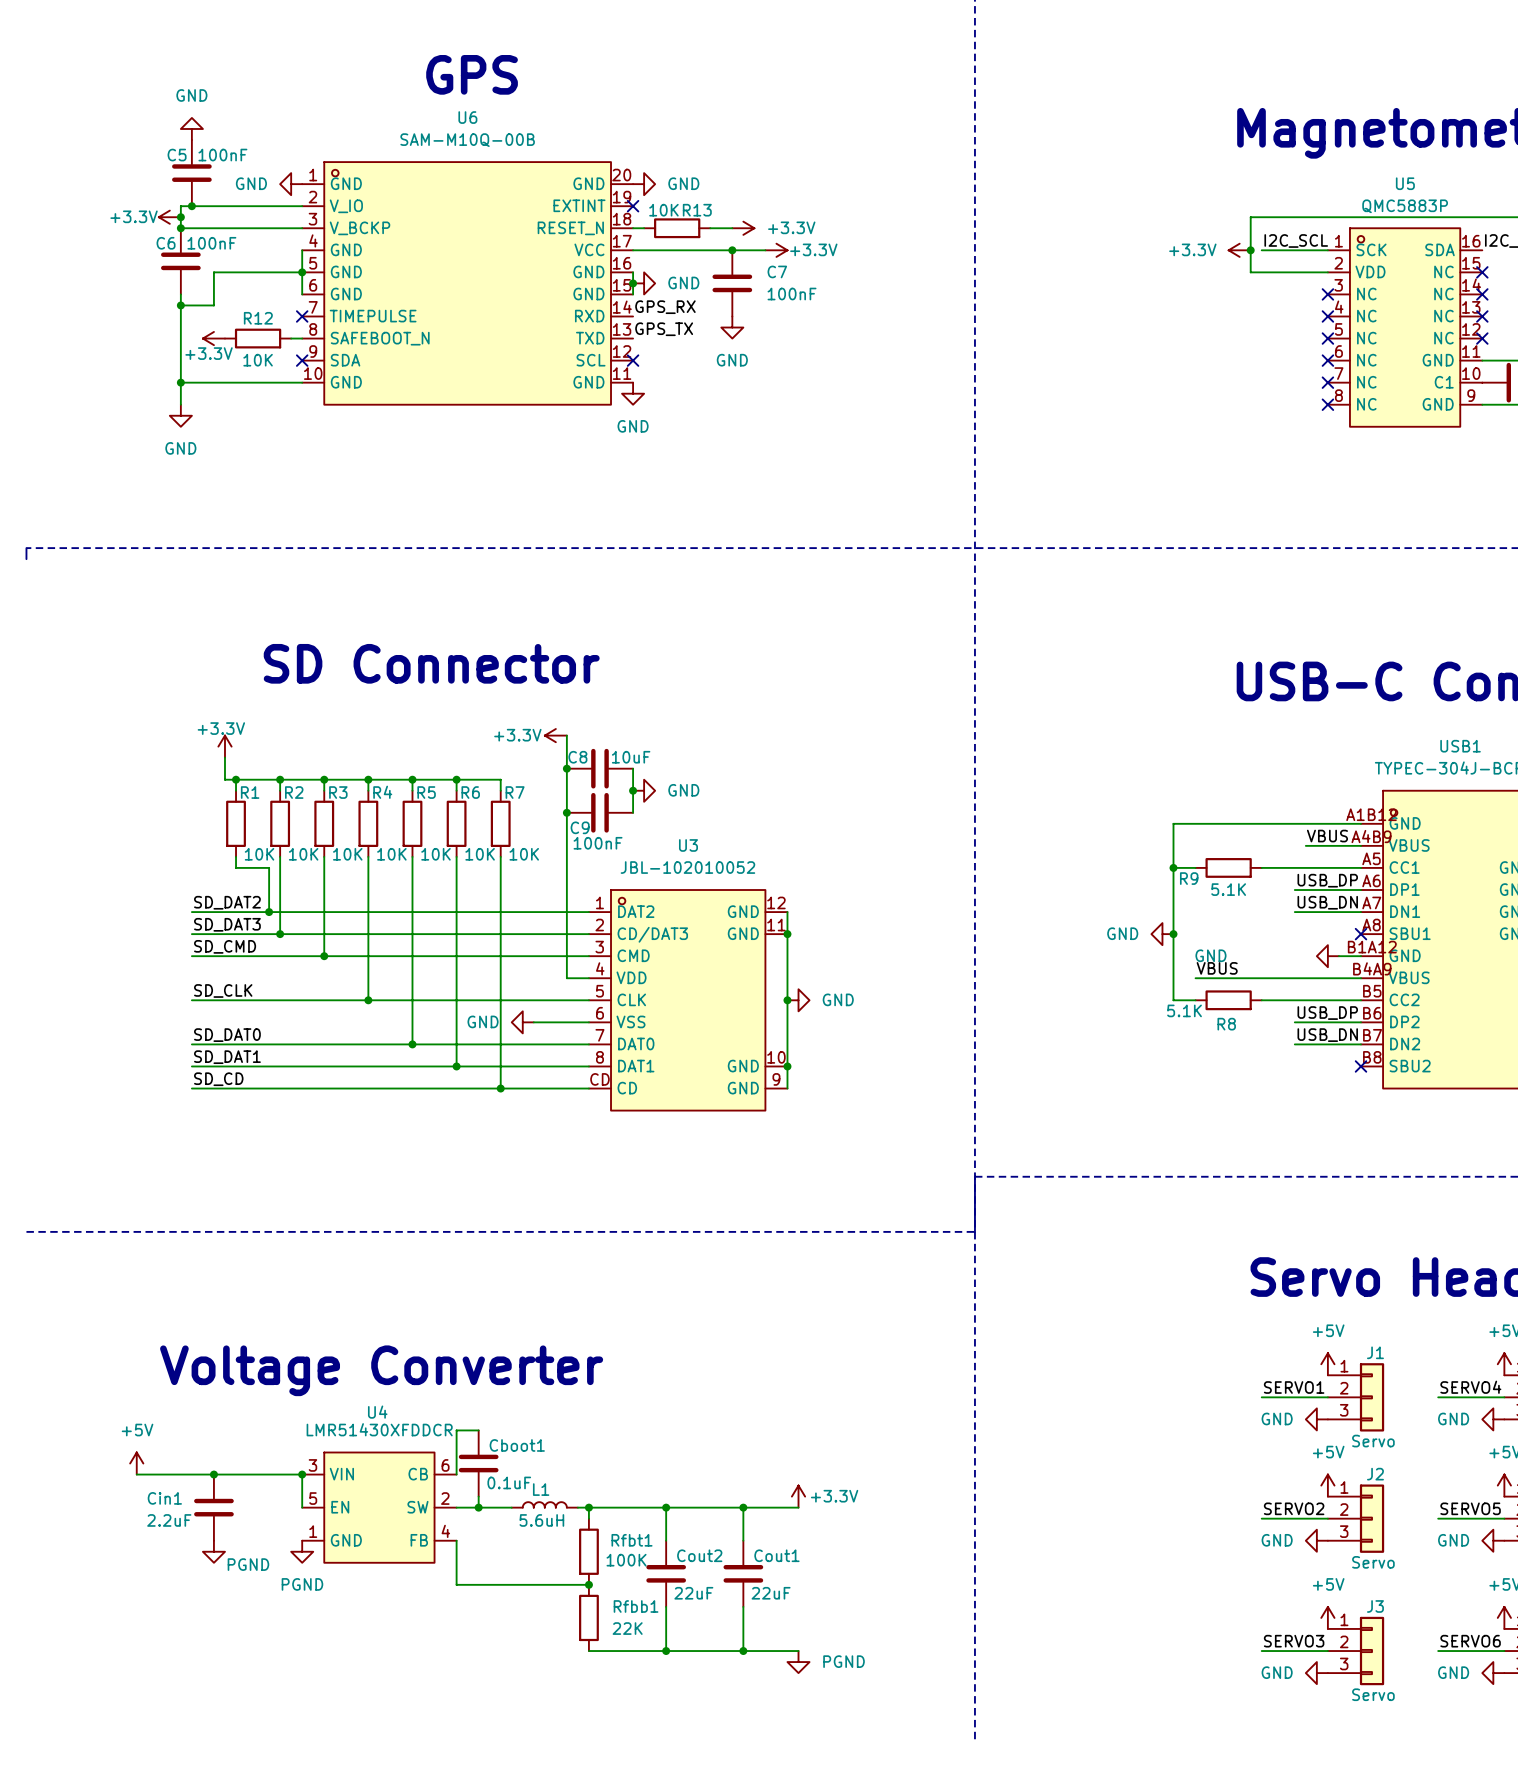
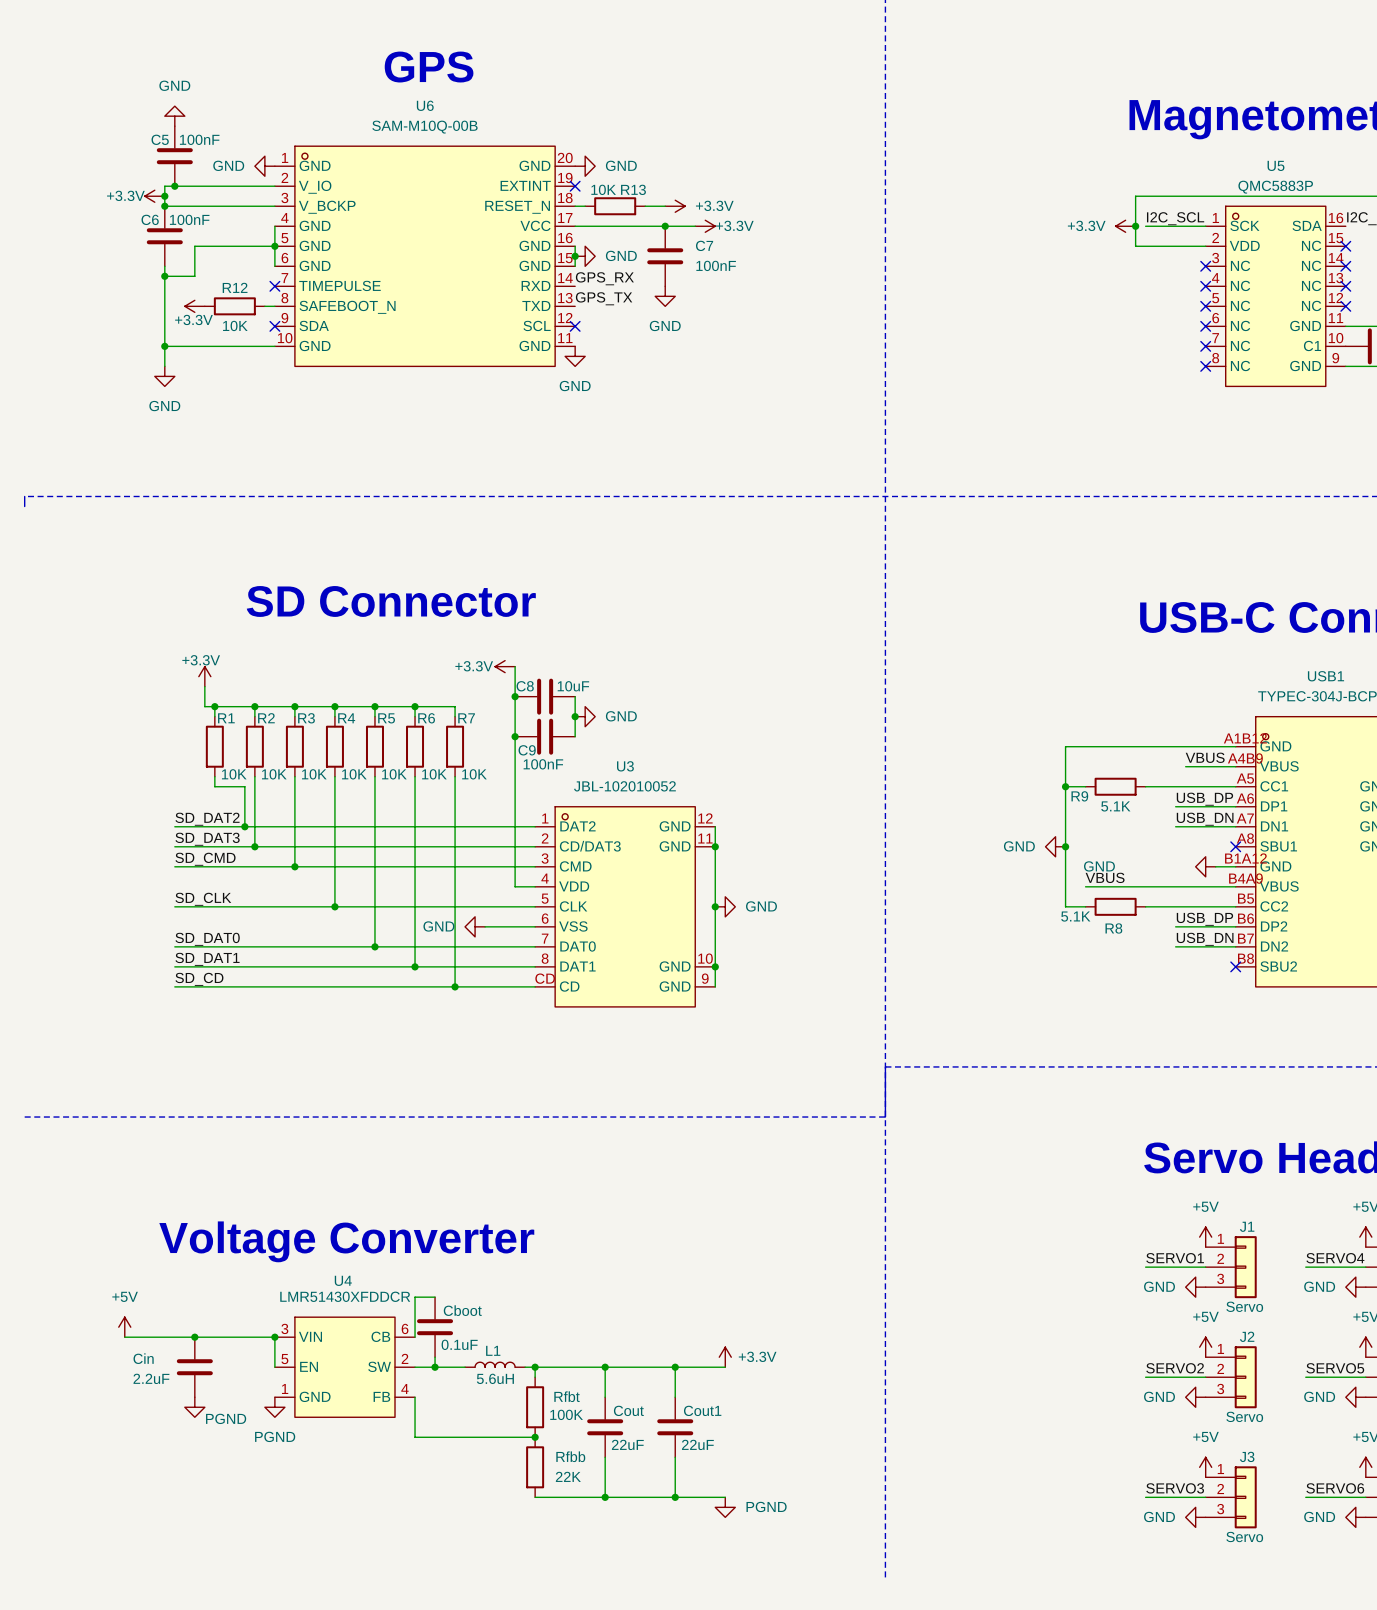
Cboot1 name: Cboot1 (517, 1445) -> Cboot (462, 1310)
Cin1 name: Cin1 (164, 1498) -> Cin (143, 1358)
Rfbt1 name: Rfbt1 (631, 1540) -> Rfbt (567, 1396)
Cout2 name: Cout2 (699, 1555) -> Cout (628, 1410)
Rfbb1 name: Rfbb1 (636, 1606) -> Rfbb (570, 1456)

